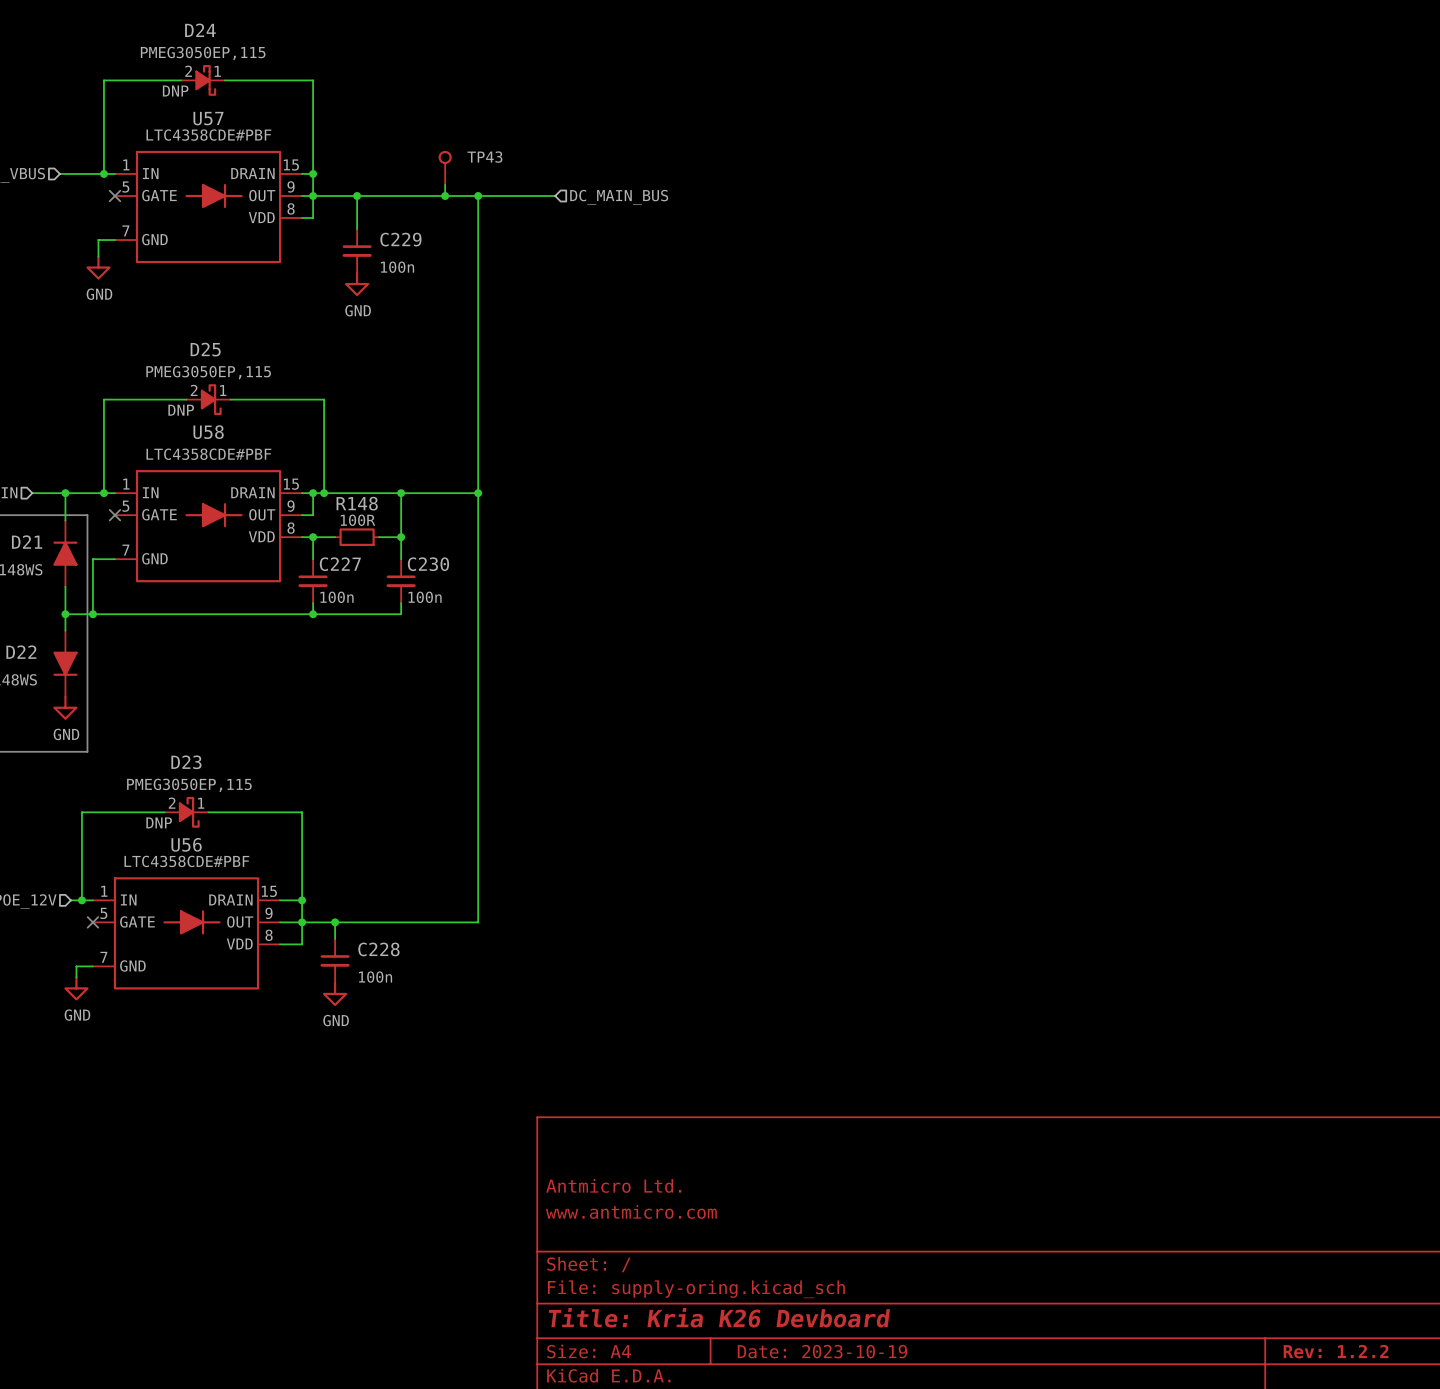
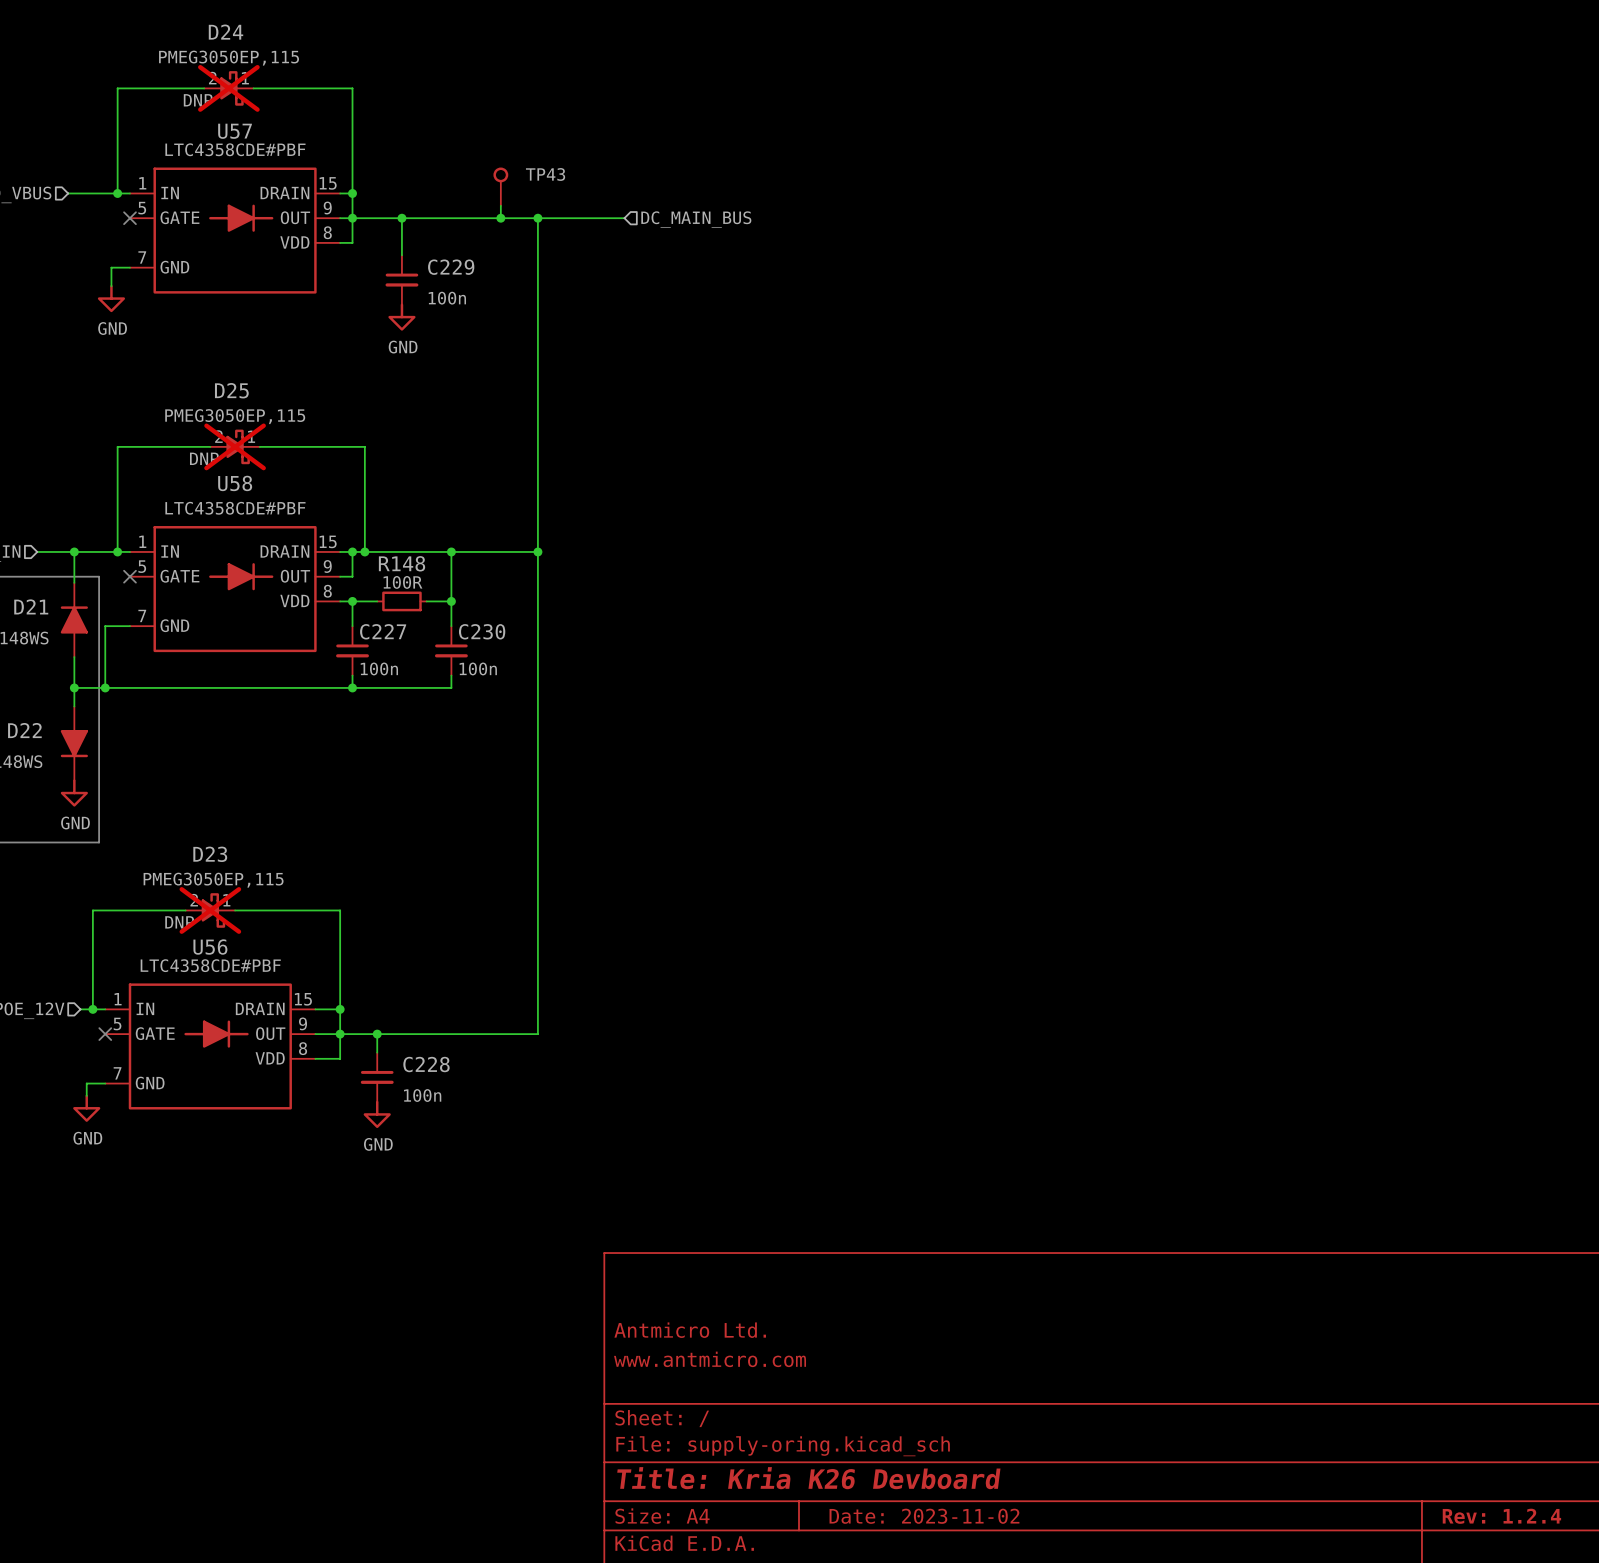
D24 do-not-place cross: none -> (228, 88)
D25 do-not-place cross: none -> (235, 446)
D23 do-not-place cross: none -> (210, 910)
title block: Date: 2023-10-19 (822, 1351) -> Date: 2023-11-02 (924, 1516)
title block: Rev: 1.2.2 (1336, 1351) -> Rev: 1.2.4 (1501, 1516)

